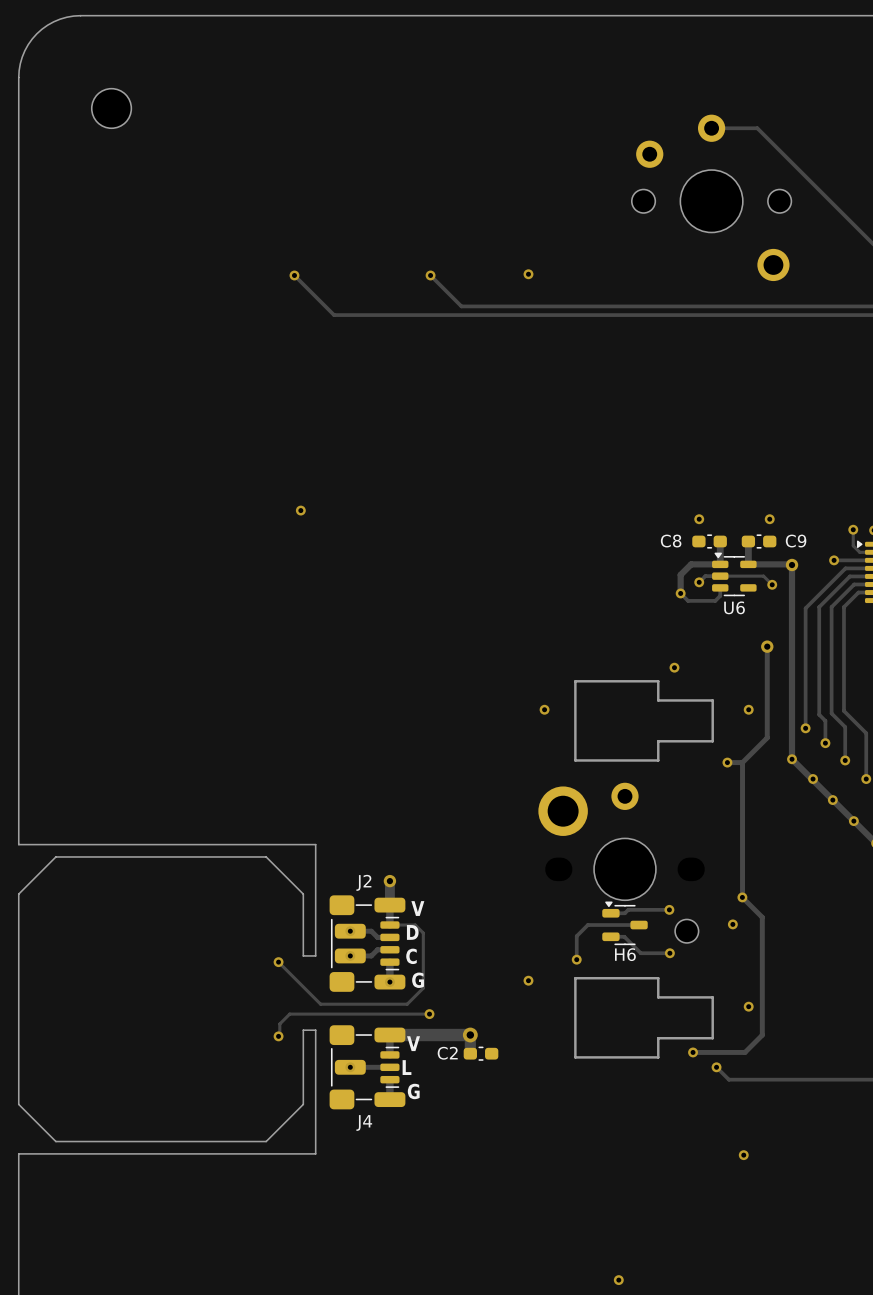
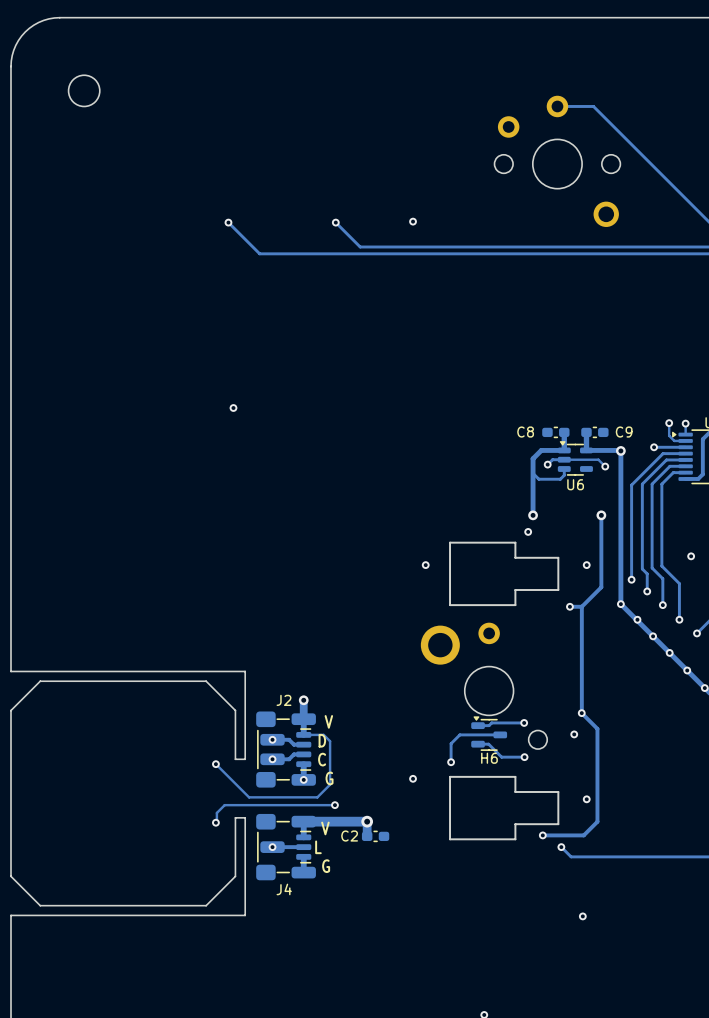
via: (699, 519) -> none
via: (769, 519) -> none
track: none -> (533, 473) (533, 515)
via: (680, 593) -> none
via: none -> (533, 515)

